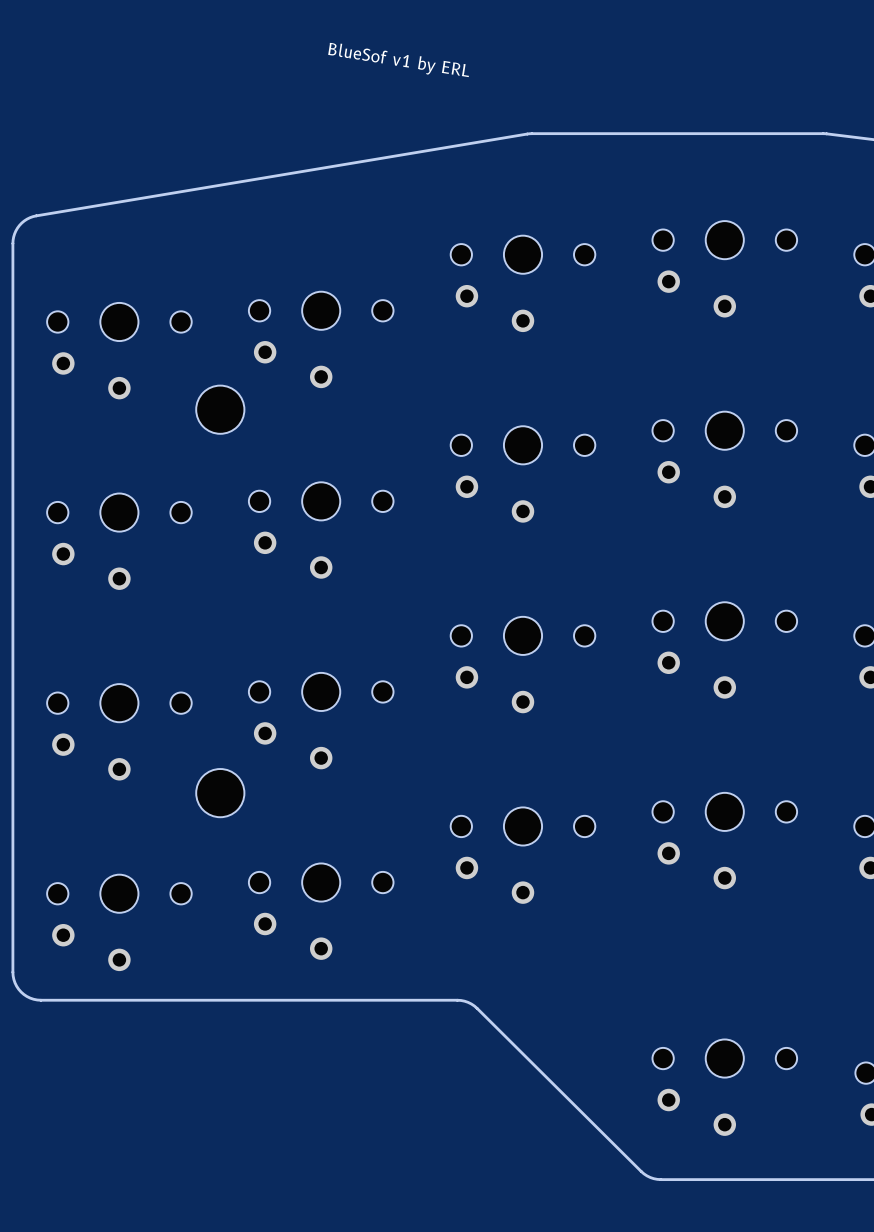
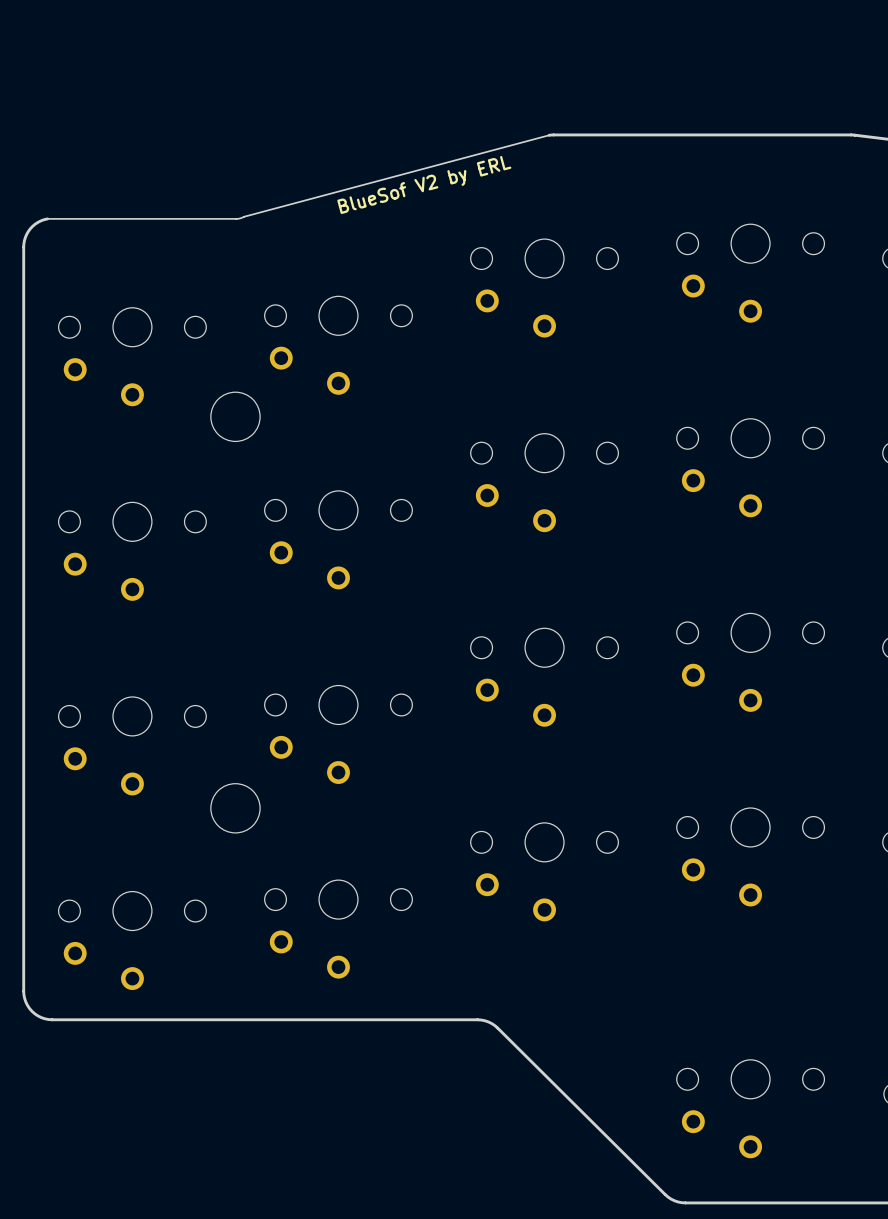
text: BlueSof v1 by ERL (398, 60) -> none
board edge: (527, 134) (36, 215) -> (548, 135) (239, 218) (47, 218)
text: none -> BlueSof V2 by ERL (424, 184)

